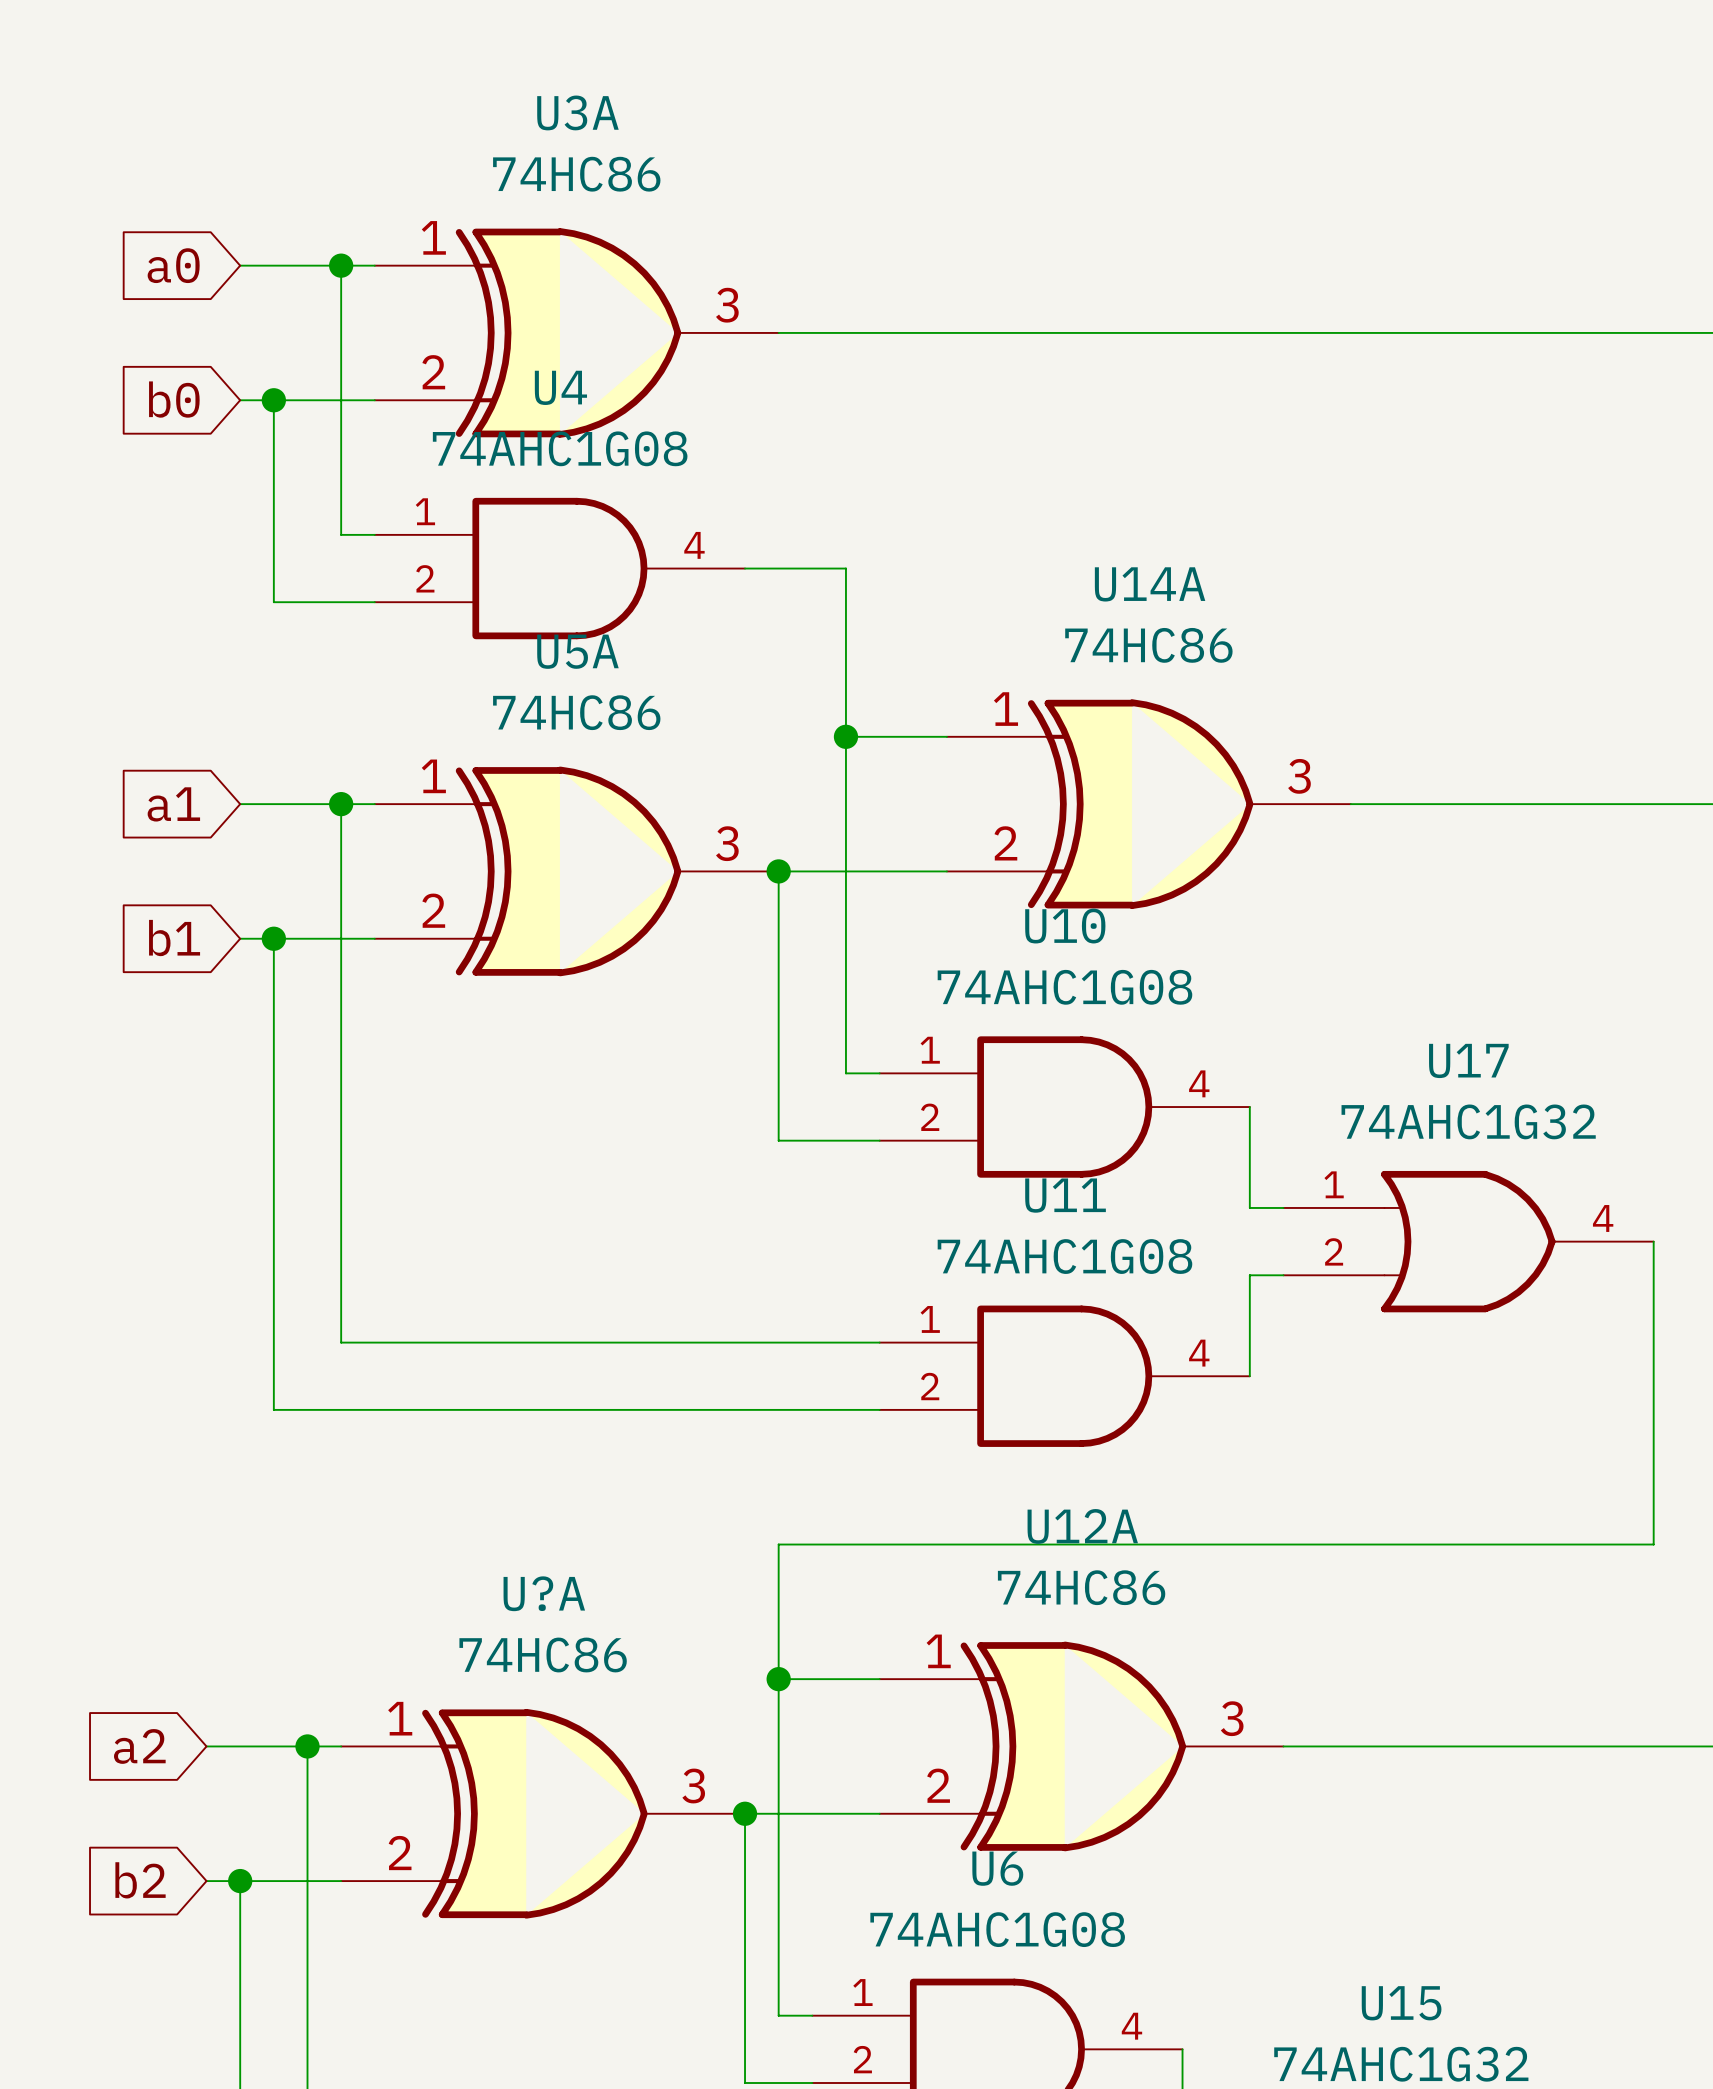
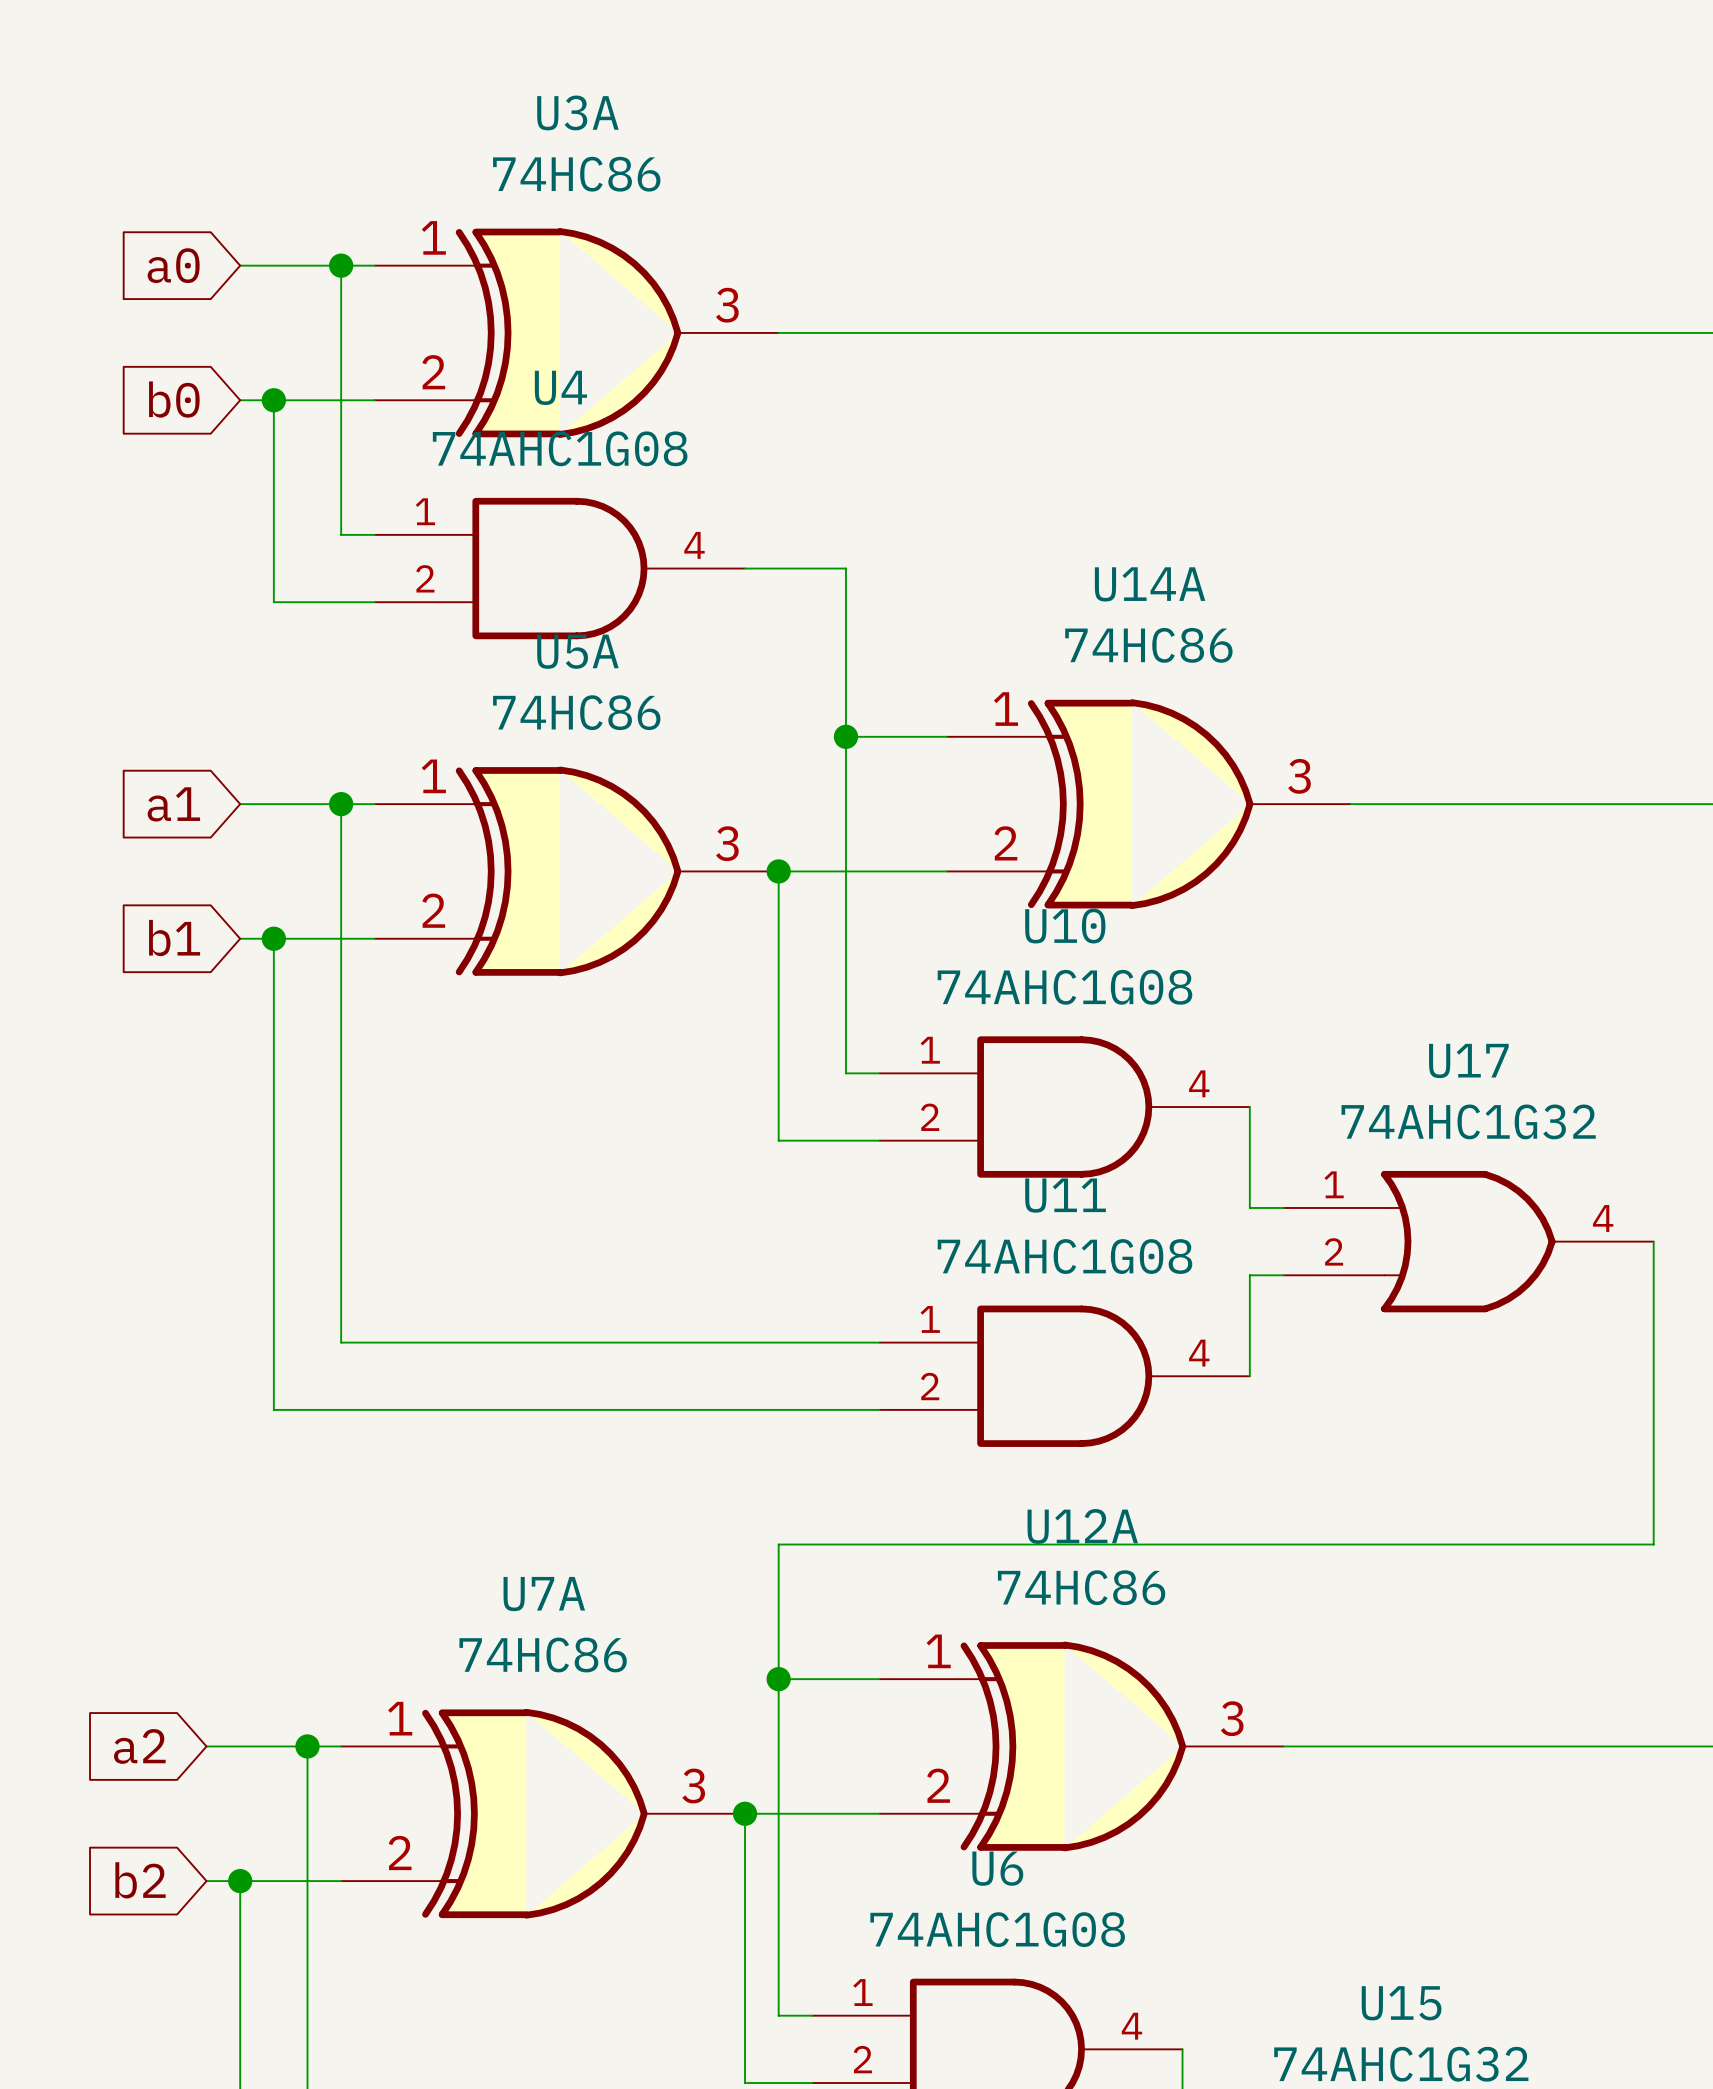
U?A name: U?A (544, 1593) -> U7A (544, 1594)

